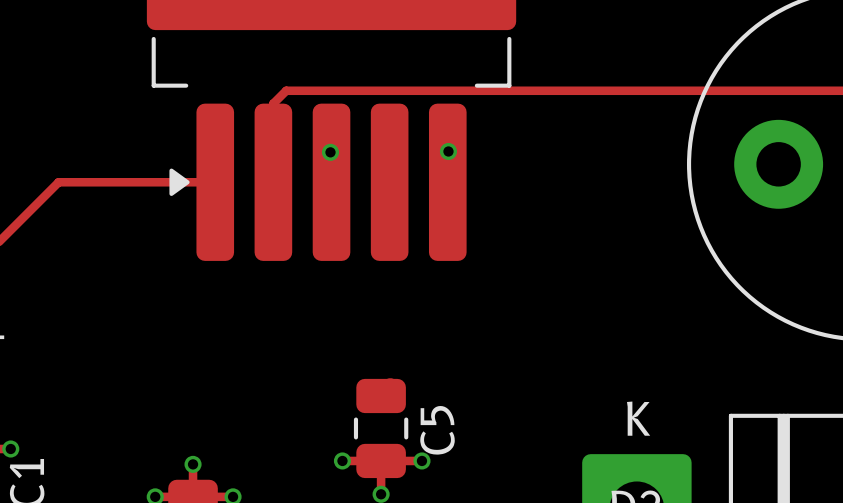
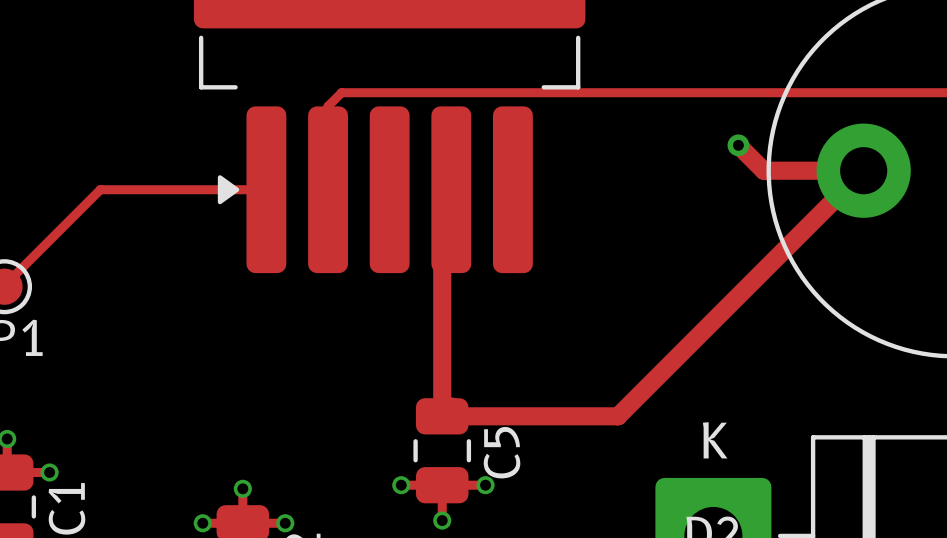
track: none -> (738, 145) (763, 170) (863, 170) (618, 416) (442, 416) (442, 198) (451, 189)
via: none -> (738, 145)
via: (448, 151) -> none
via: (330, 152) -> none

